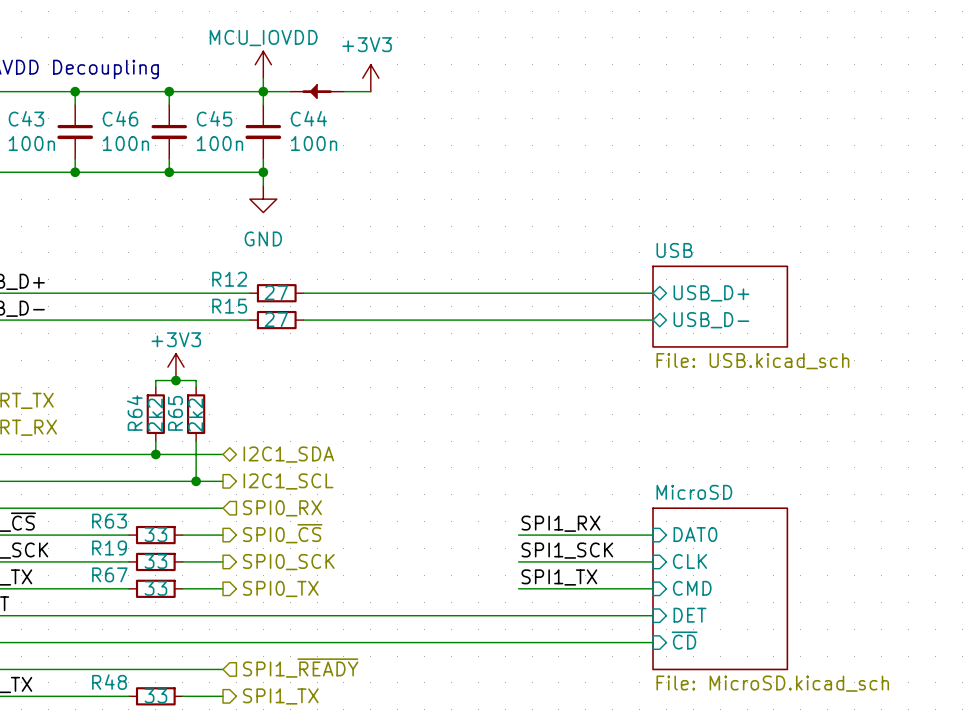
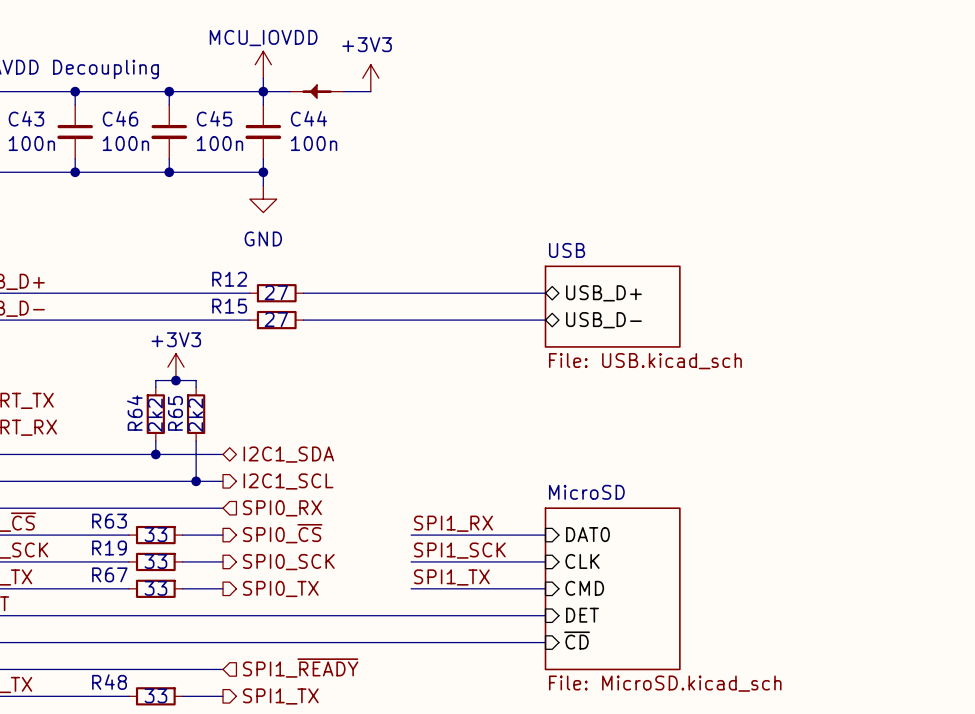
wire: (545, 293) (653, 293) -> none
sheet pin position: USB_D+ (711, 293) -> USB_D+ (603, 293)
sheet USB position: (720, 306) -> (612, 306)
wire: (545, 320) (653, 320) -> none
sheet pin position: USB_D- (711, 320) -> USB_D- (603, 320)
label position: SPI1_RX (560, 523) -> SPI1_RX (453, 523)
sheet pin position: DAT0 (695, 534) -> DAT0 (587, 534)
wire: (545, 535) (653, 535) -> (411, 535) (518, 535)
label position: SPI1_SCK (567, 550) -> SPI1_SCK (459, 550)
wire: (545, 561) (653, 561) -> (411, 561) (518, 561)
sheet pin position: CLK (690, 561) -> CLK (582, 561)
label position: SPI1_TX (559, 577) -> SPI1_TX (451, 577)
wire: (545, 588) (653, 588) -> (411, 588) (518, 588)
sheet pin position: CMD (692, 588) -> CMD (584, 588)
sheet MicroSD position: (720, 588) -> (612, 588)
wire: (545, 615) (653, 615) -> none
sheet pin position: DET (690, 615) -> DET (582, 615)
sheet pin position: ~{CD} (684, 640) -> ~{CD} (577, 640)
wire: (545, 642) (653, 642) -> none

